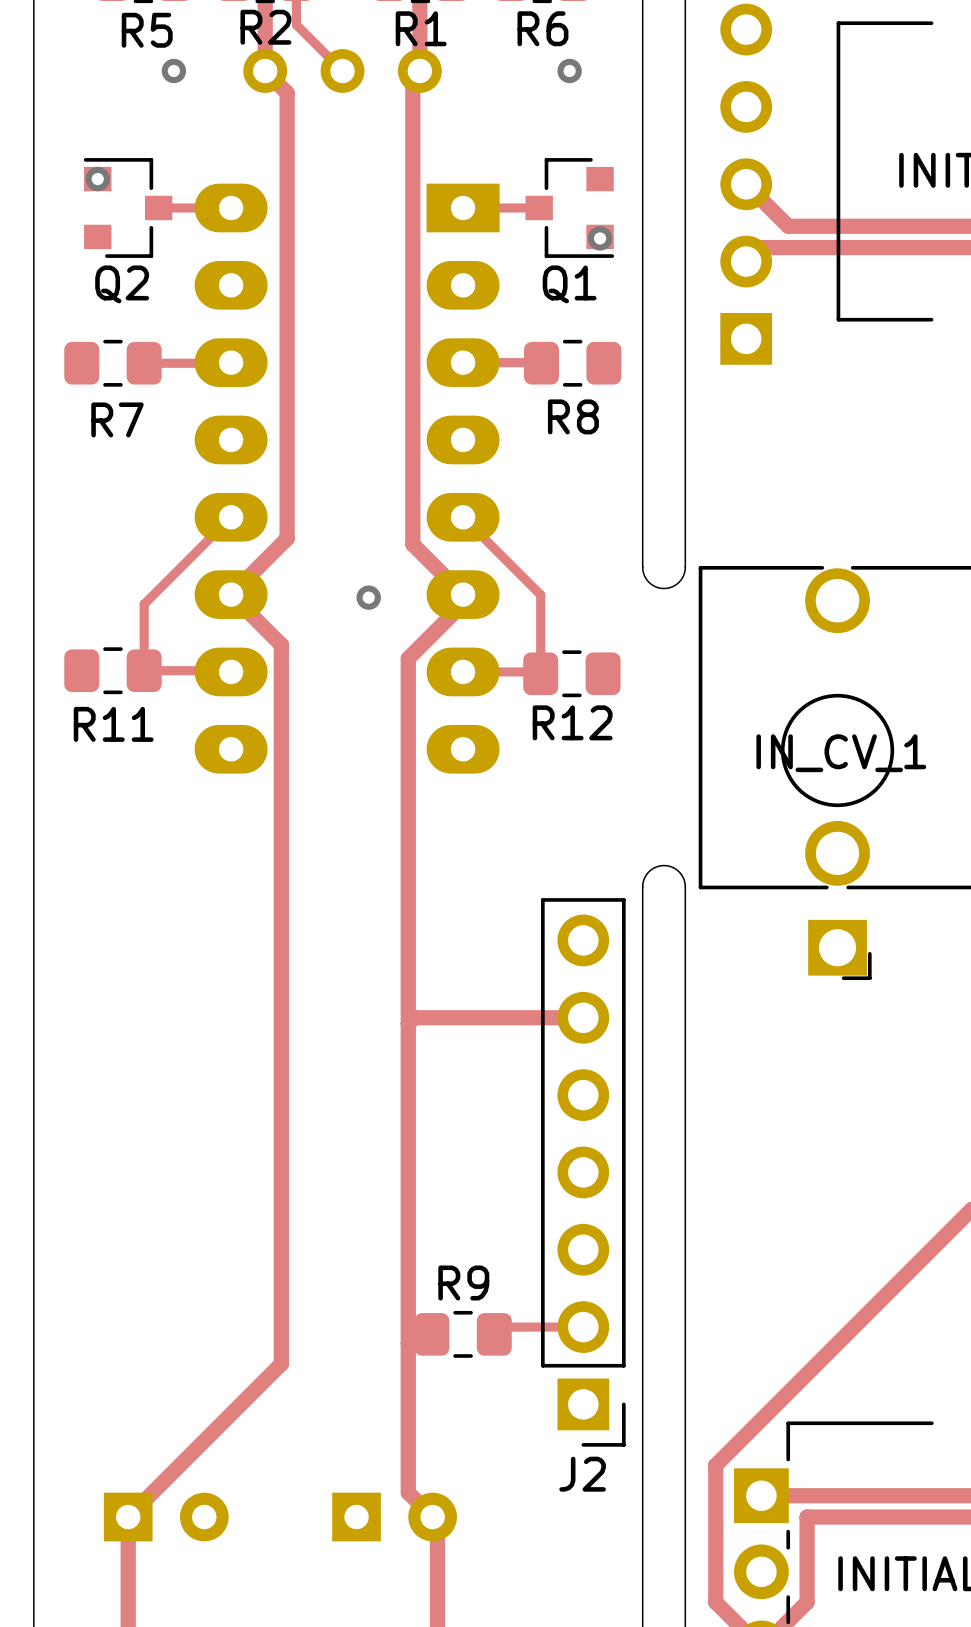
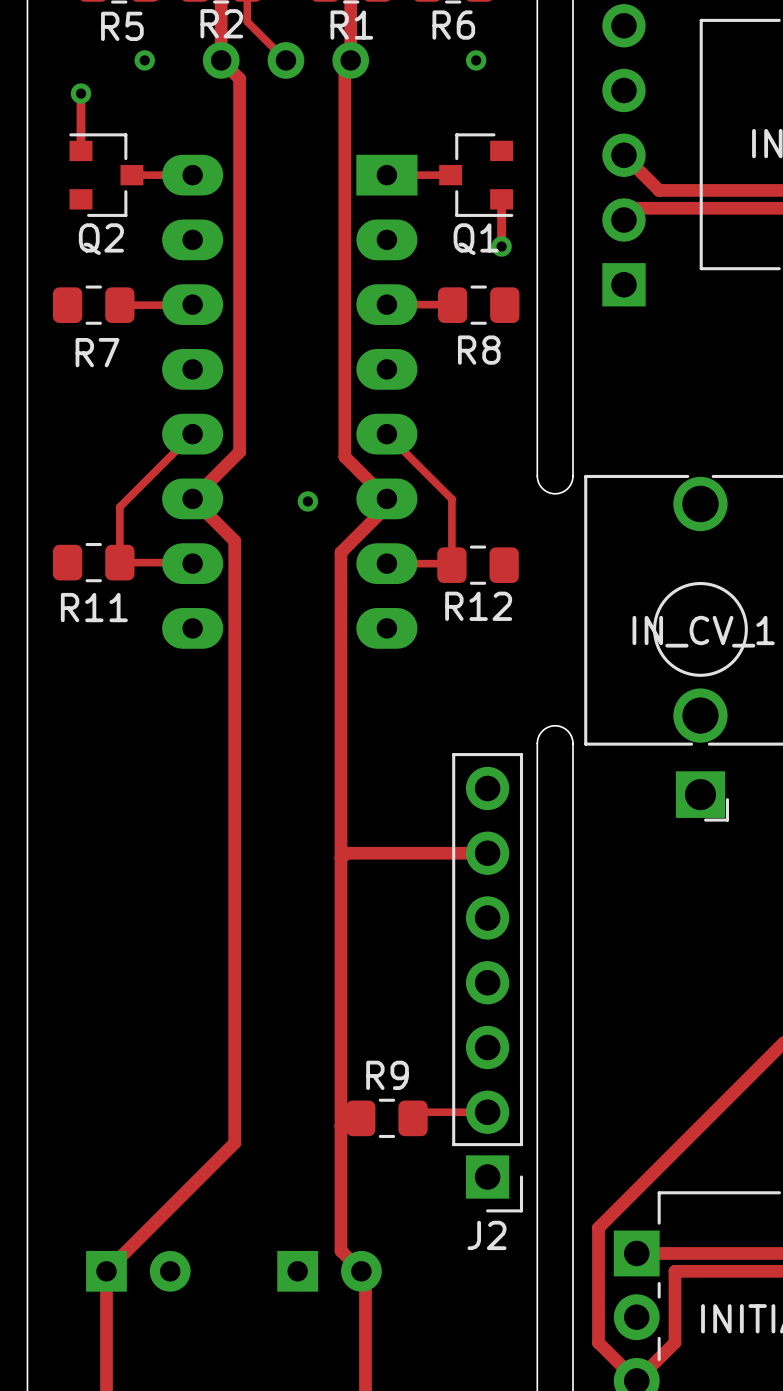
track: none -> (81, 93) (81, 150)
via position: (97, 179) -> (81, 93)
track: none -> (501, 199) (501, 246)
via position: (600, 238) -> (501, 246)

